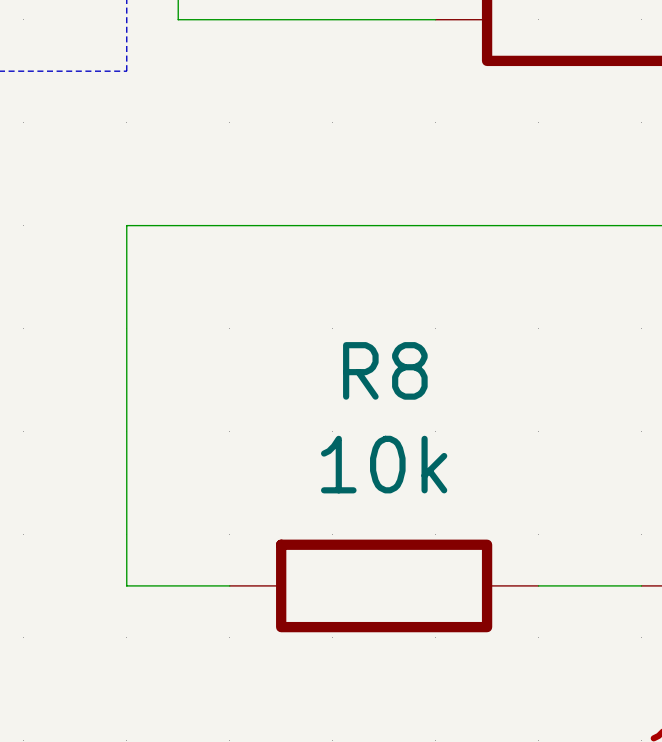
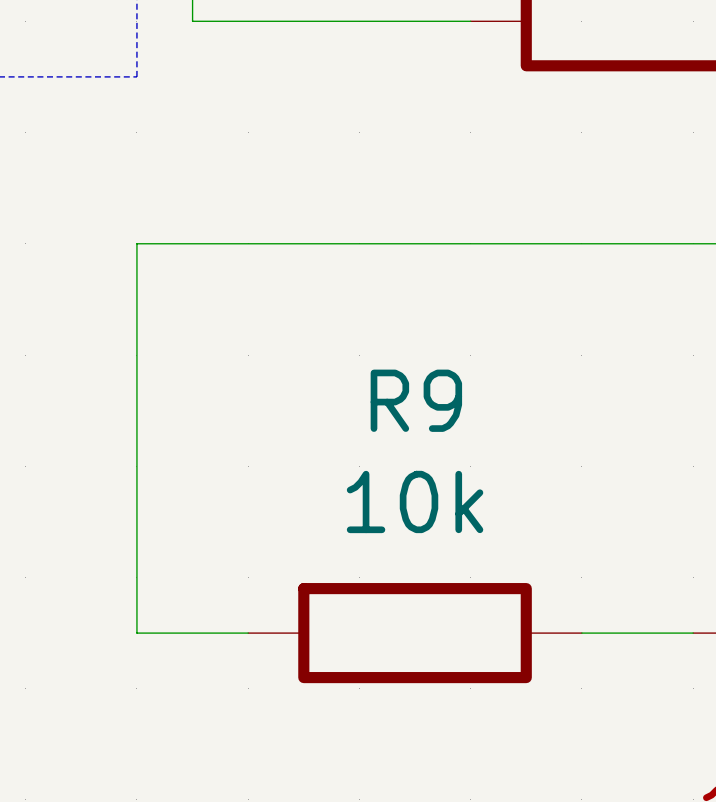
R8 name: R8 (385, 370) -> R9 (416, 400)

